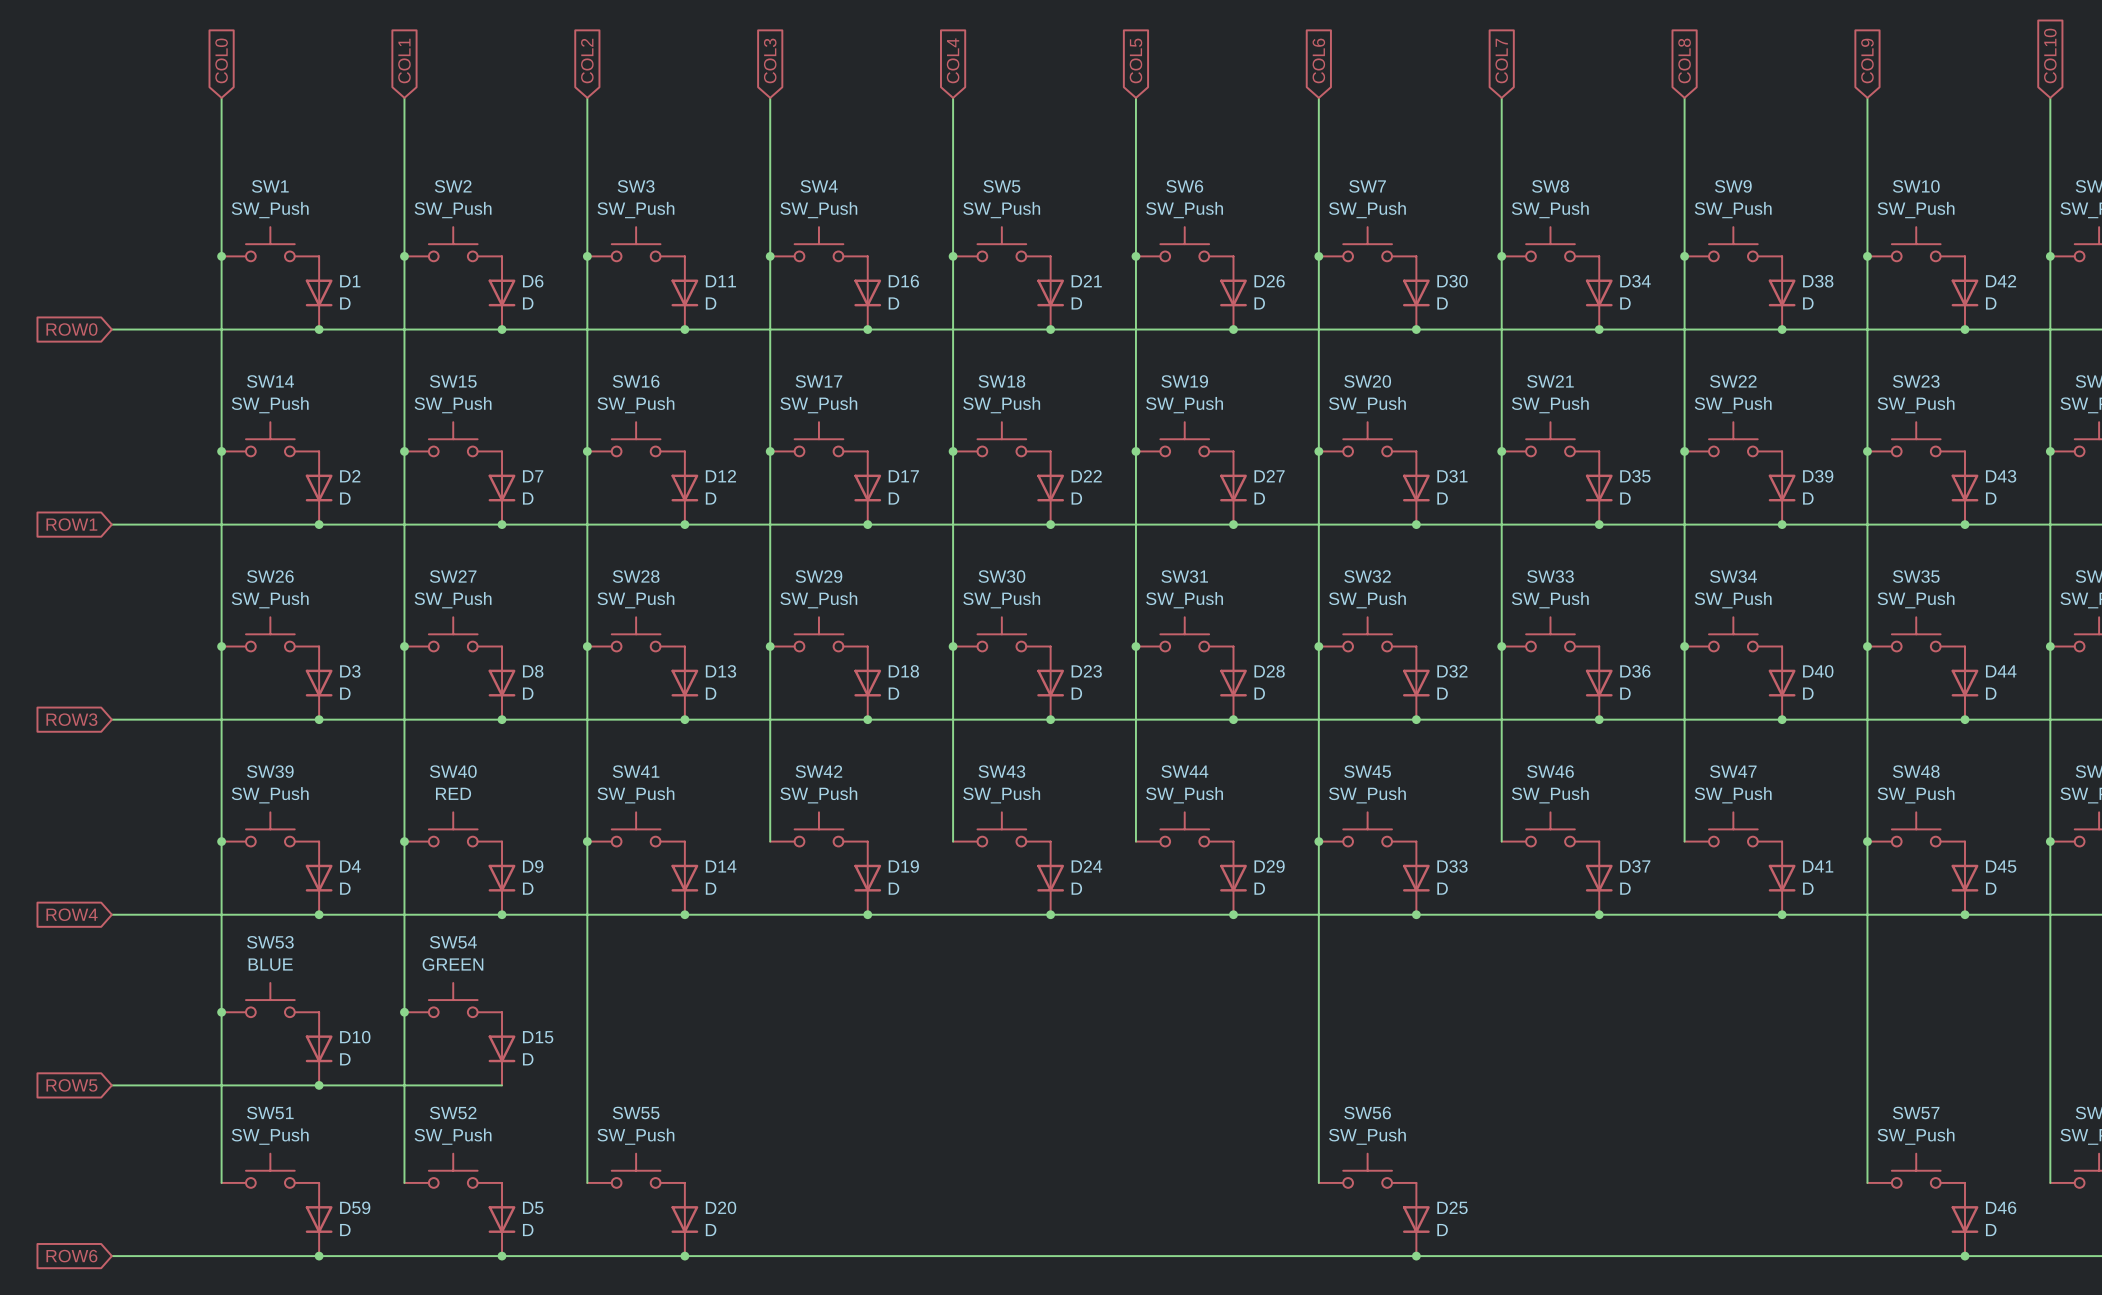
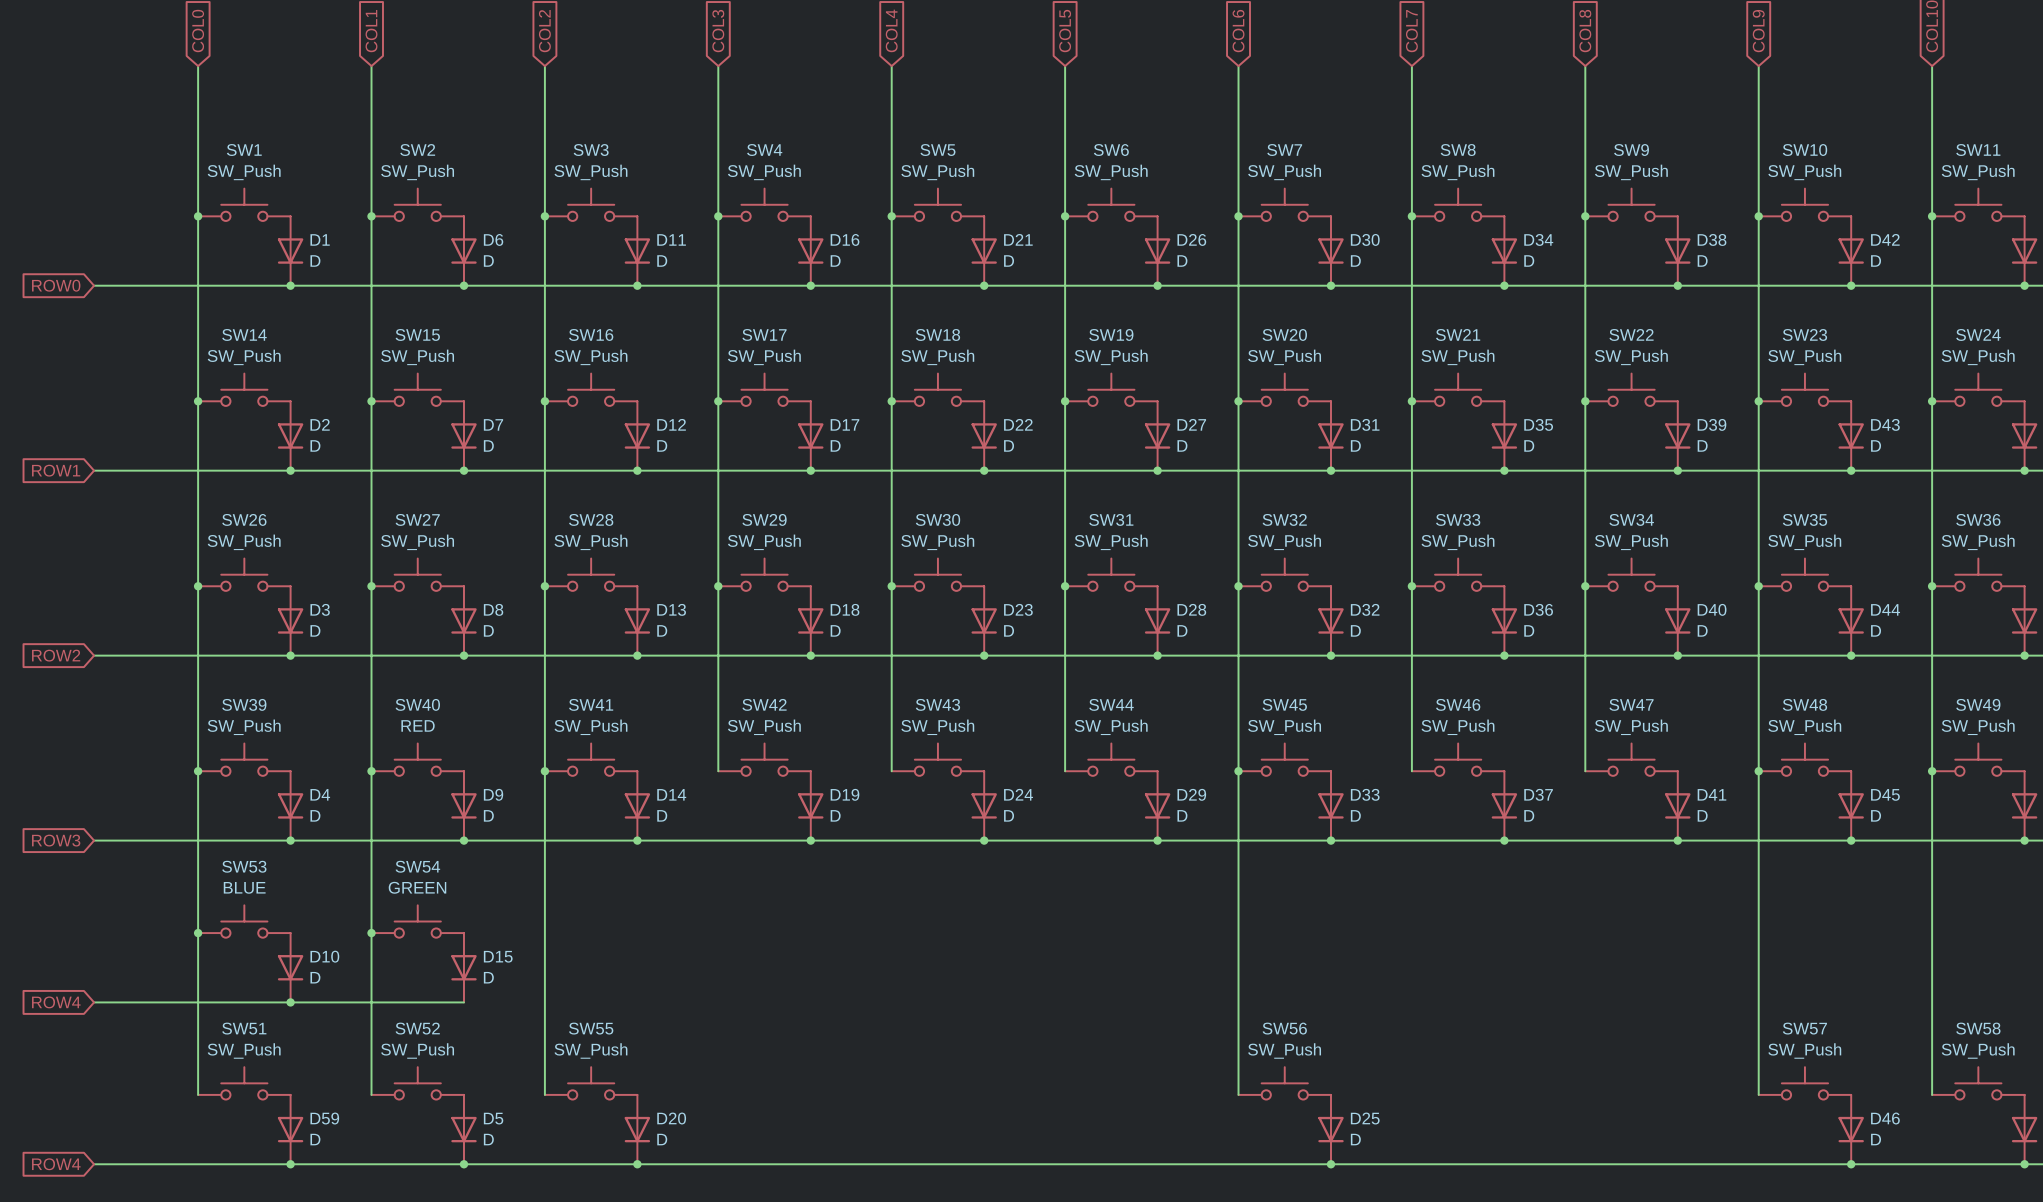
global label: ROW3 (71, 719) -> ROW2 (56, 655)
global label: ROW4 (72, 914) -> ROW3 (56, 840)
global label: ROW5 (71, 1085) -> ROW4 (56, 1002)
global label: ROW6 (71, 1256) -> ROW4 (56, 1164)

